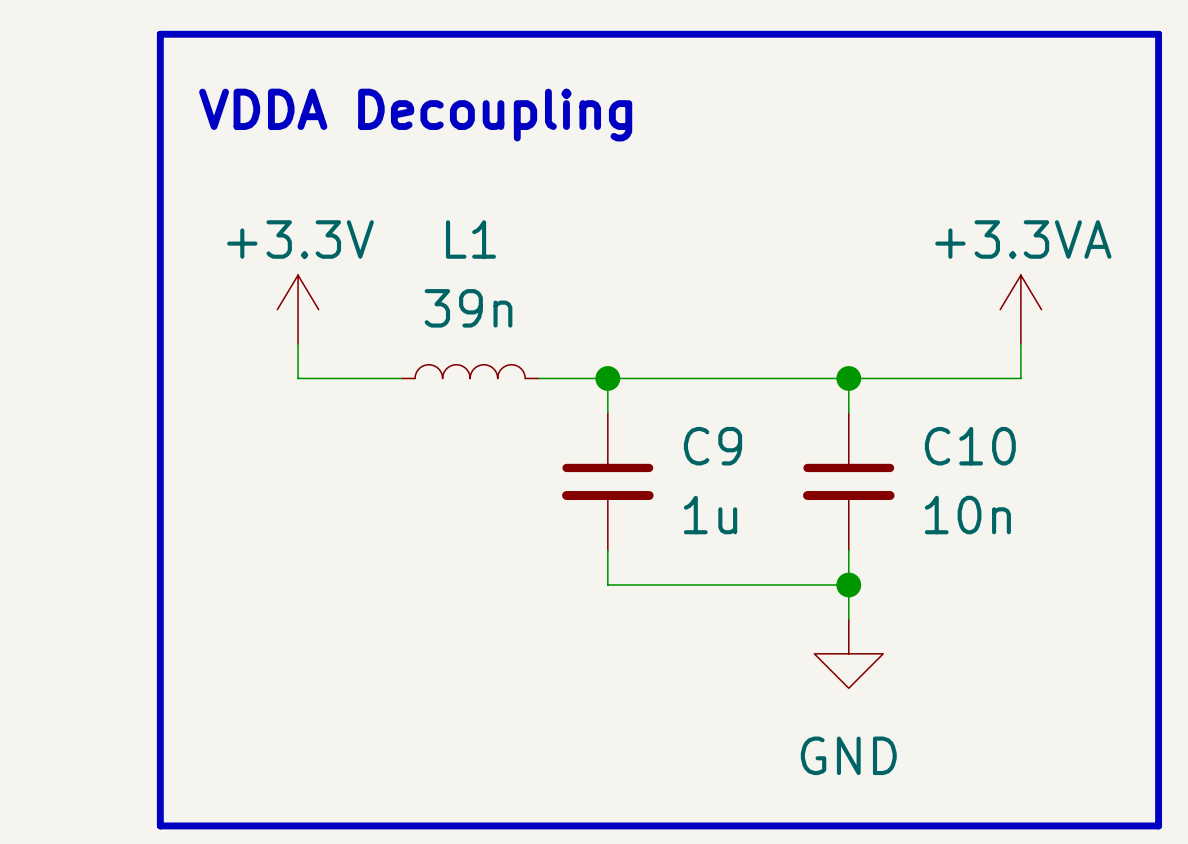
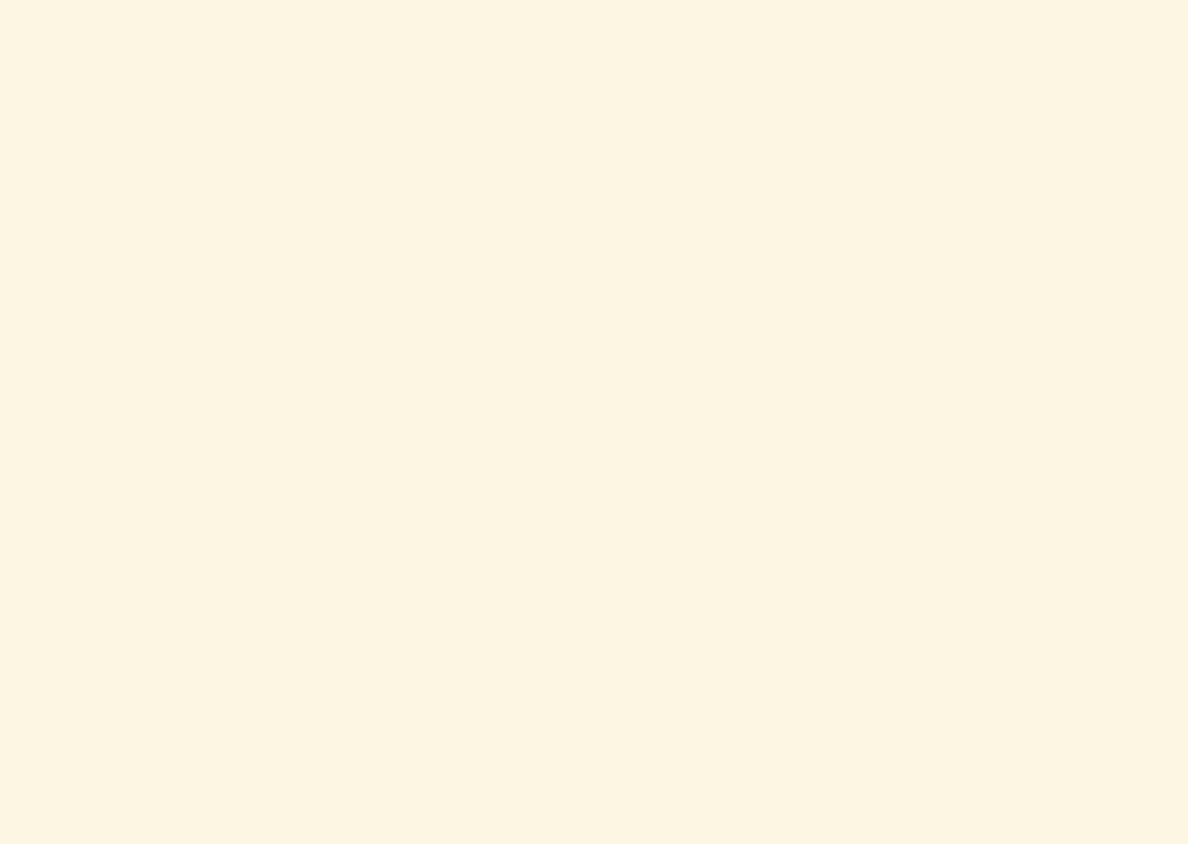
line: (160, 34) (1158, 34) (1158, 825) (160, 825) (160, 34) -> none
text: VDDA Decoupling (415, 115) -> none
power symbol: +3.3V (298, 309) -> none
power symbol: +3.3VA (1020, 309) -> none
wire: (298, 344) (298, 378) (401, 378) -> none
wire: (1020, 344) (1020, 378) (538, 378) -> none
L1: 39n (470, 371) -> none
wire: (607, 378) (607, 412) -> none
junction: (607, 378) -> none
wire: (848, 378) (848, 412) -> none
junction: (848, 378) -> none
C9: 1u (607, 481) -> none
C10: 10n (848, 481) -> none
wire: (607, 550) (607, 584) (848, 584) -> none
wire: (848, 550) (848, 619) -> none
junction: (848, 584) -> none
power symbol: GND (848, 653) -> none

